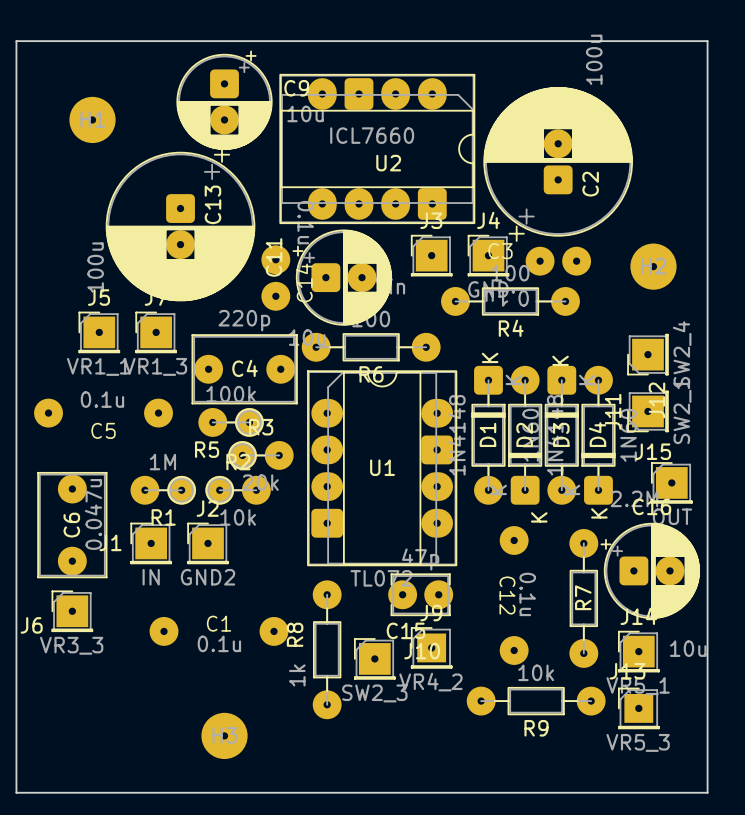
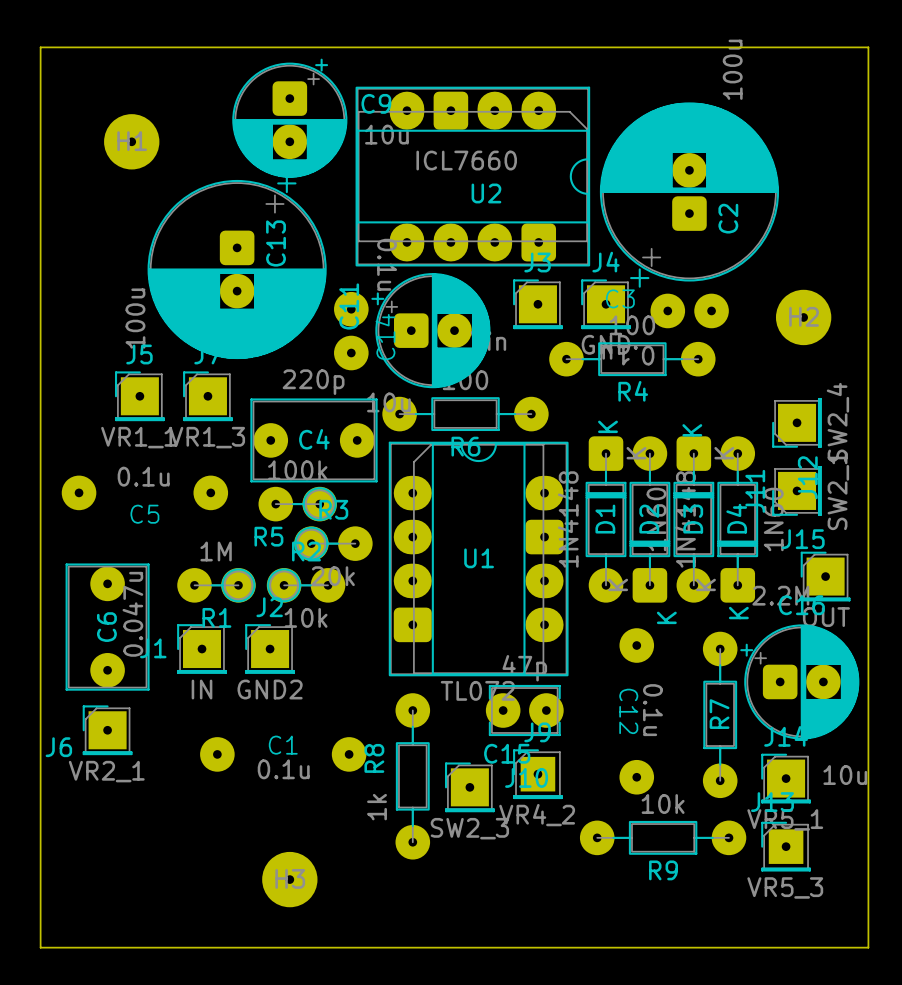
J6 value: VR3_3 (71, 645) -> VR2_1 (106, 771)

